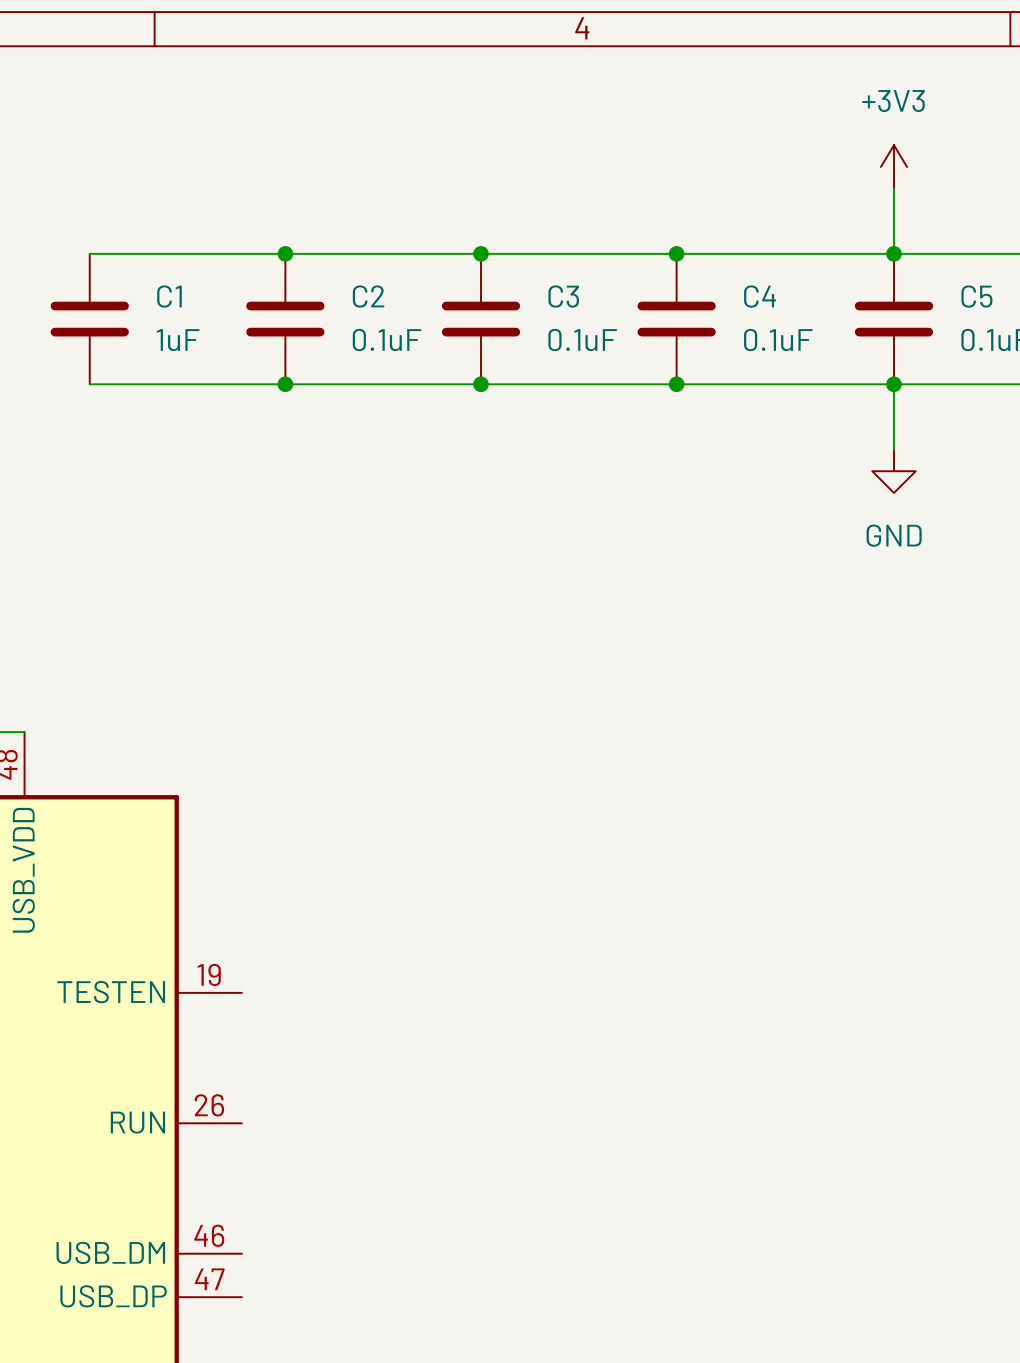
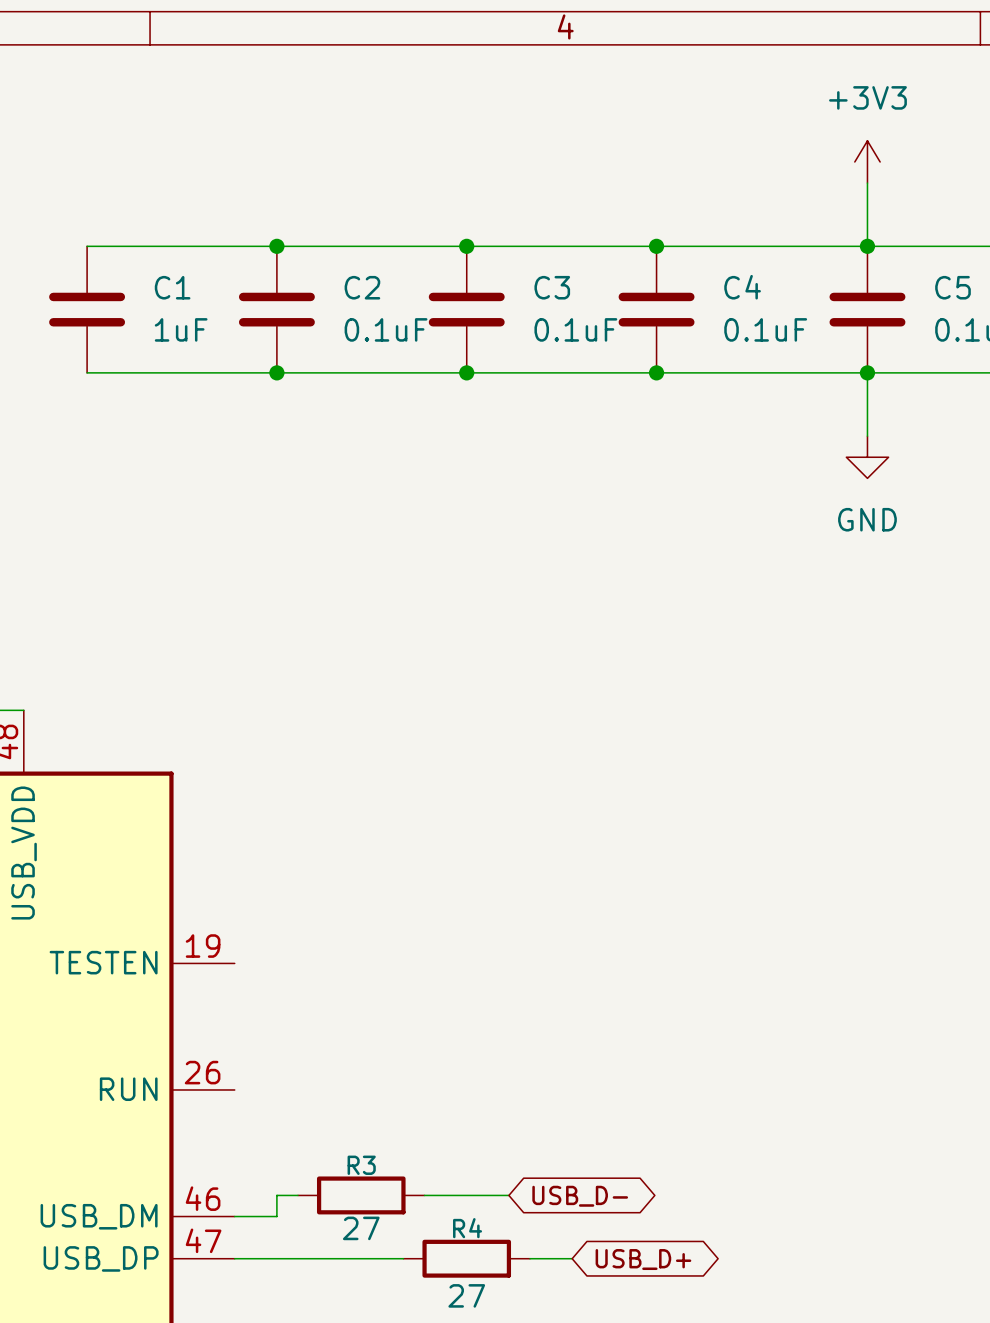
wire: none -> (298, 1195) (276, 1195) (276, 1216) (234, 1216)
R3: none -> 27 (361, 1195)
wire: none -> (424, 1195) (508, 1195)
global label: none -> USB_D- (580, 1196)
wire: none -> (234, 1258) (403, 1258)
R4: none -> 27 (466, 1258)
wire: none -> (530, 1258) (572, 1258)
global label: none -> USB_D+ (643, 1259)

